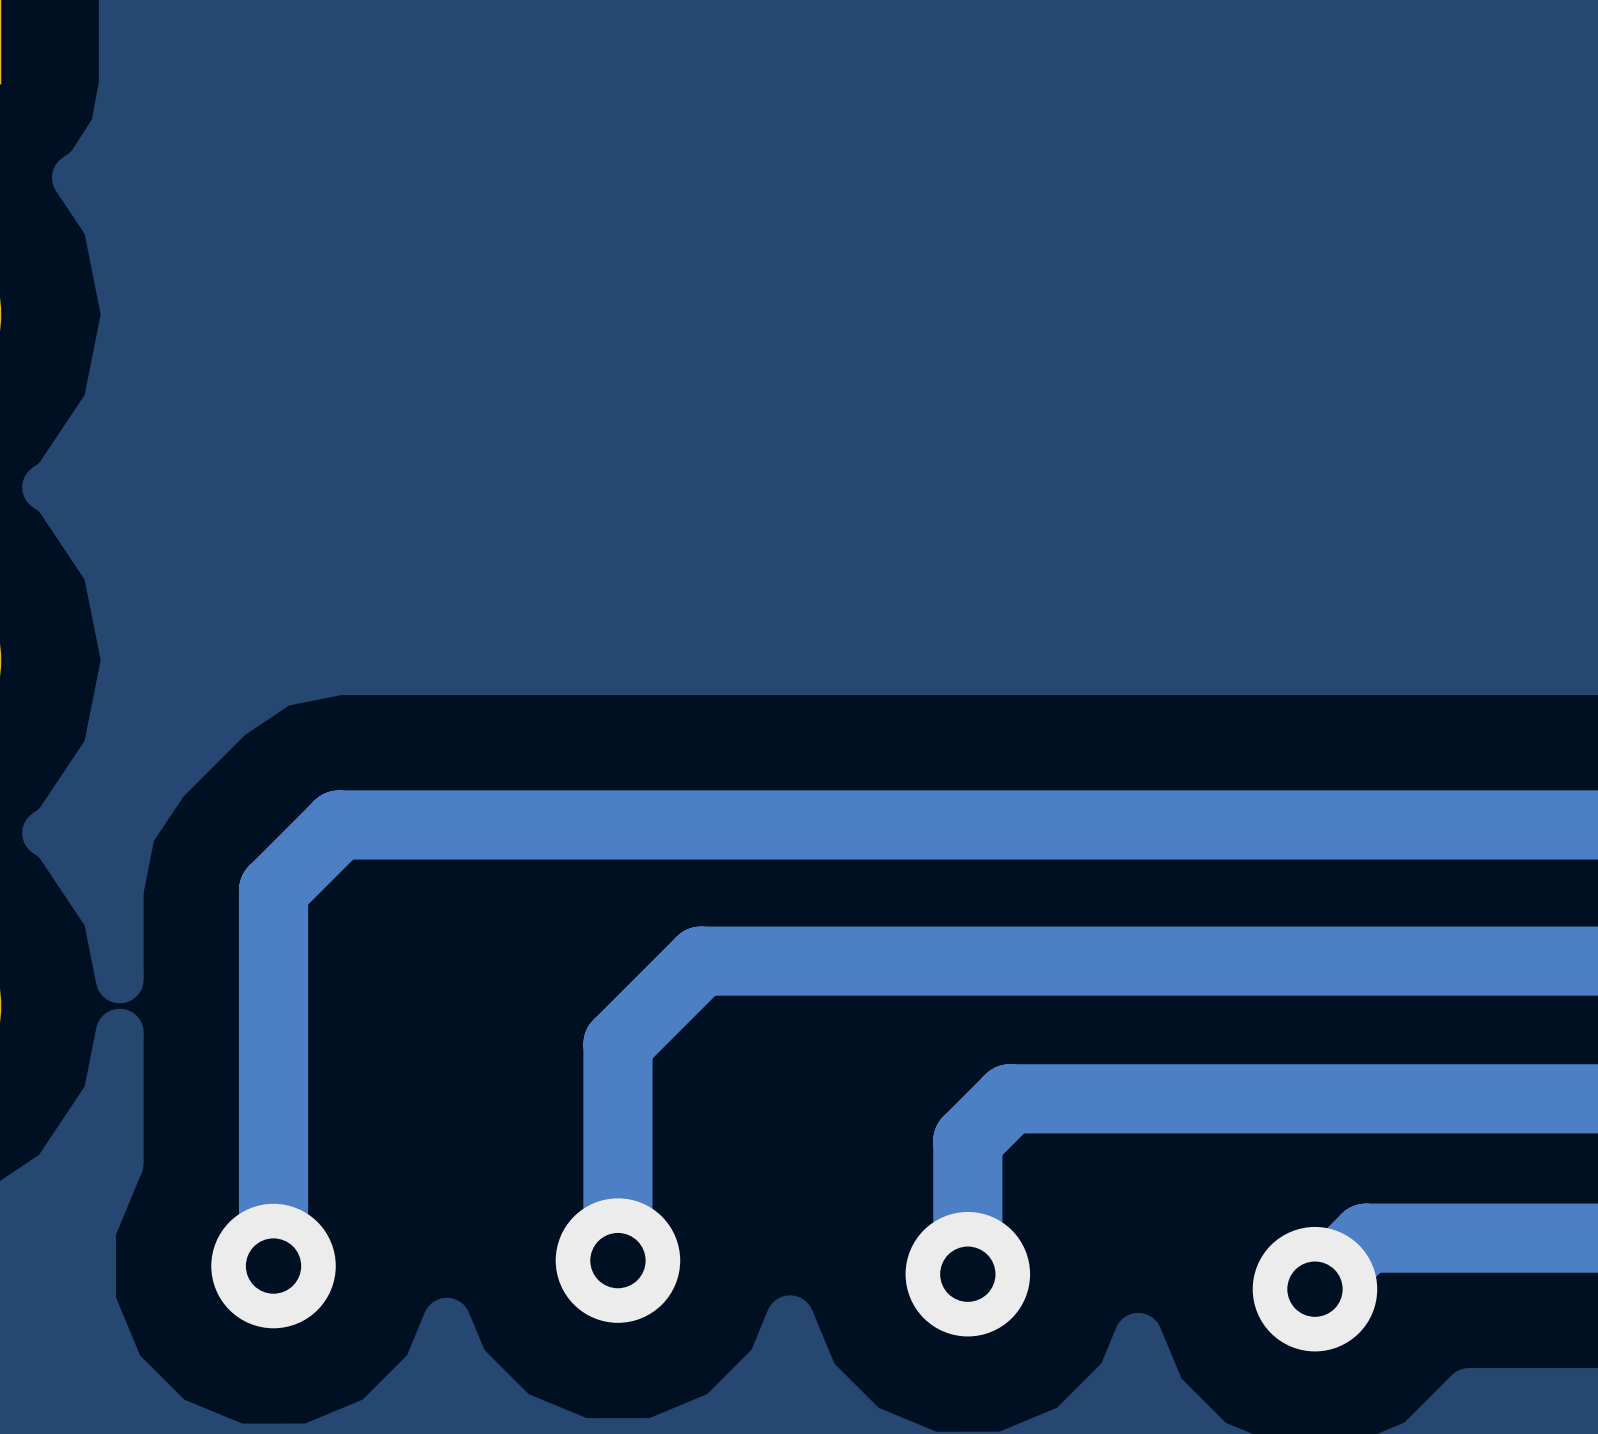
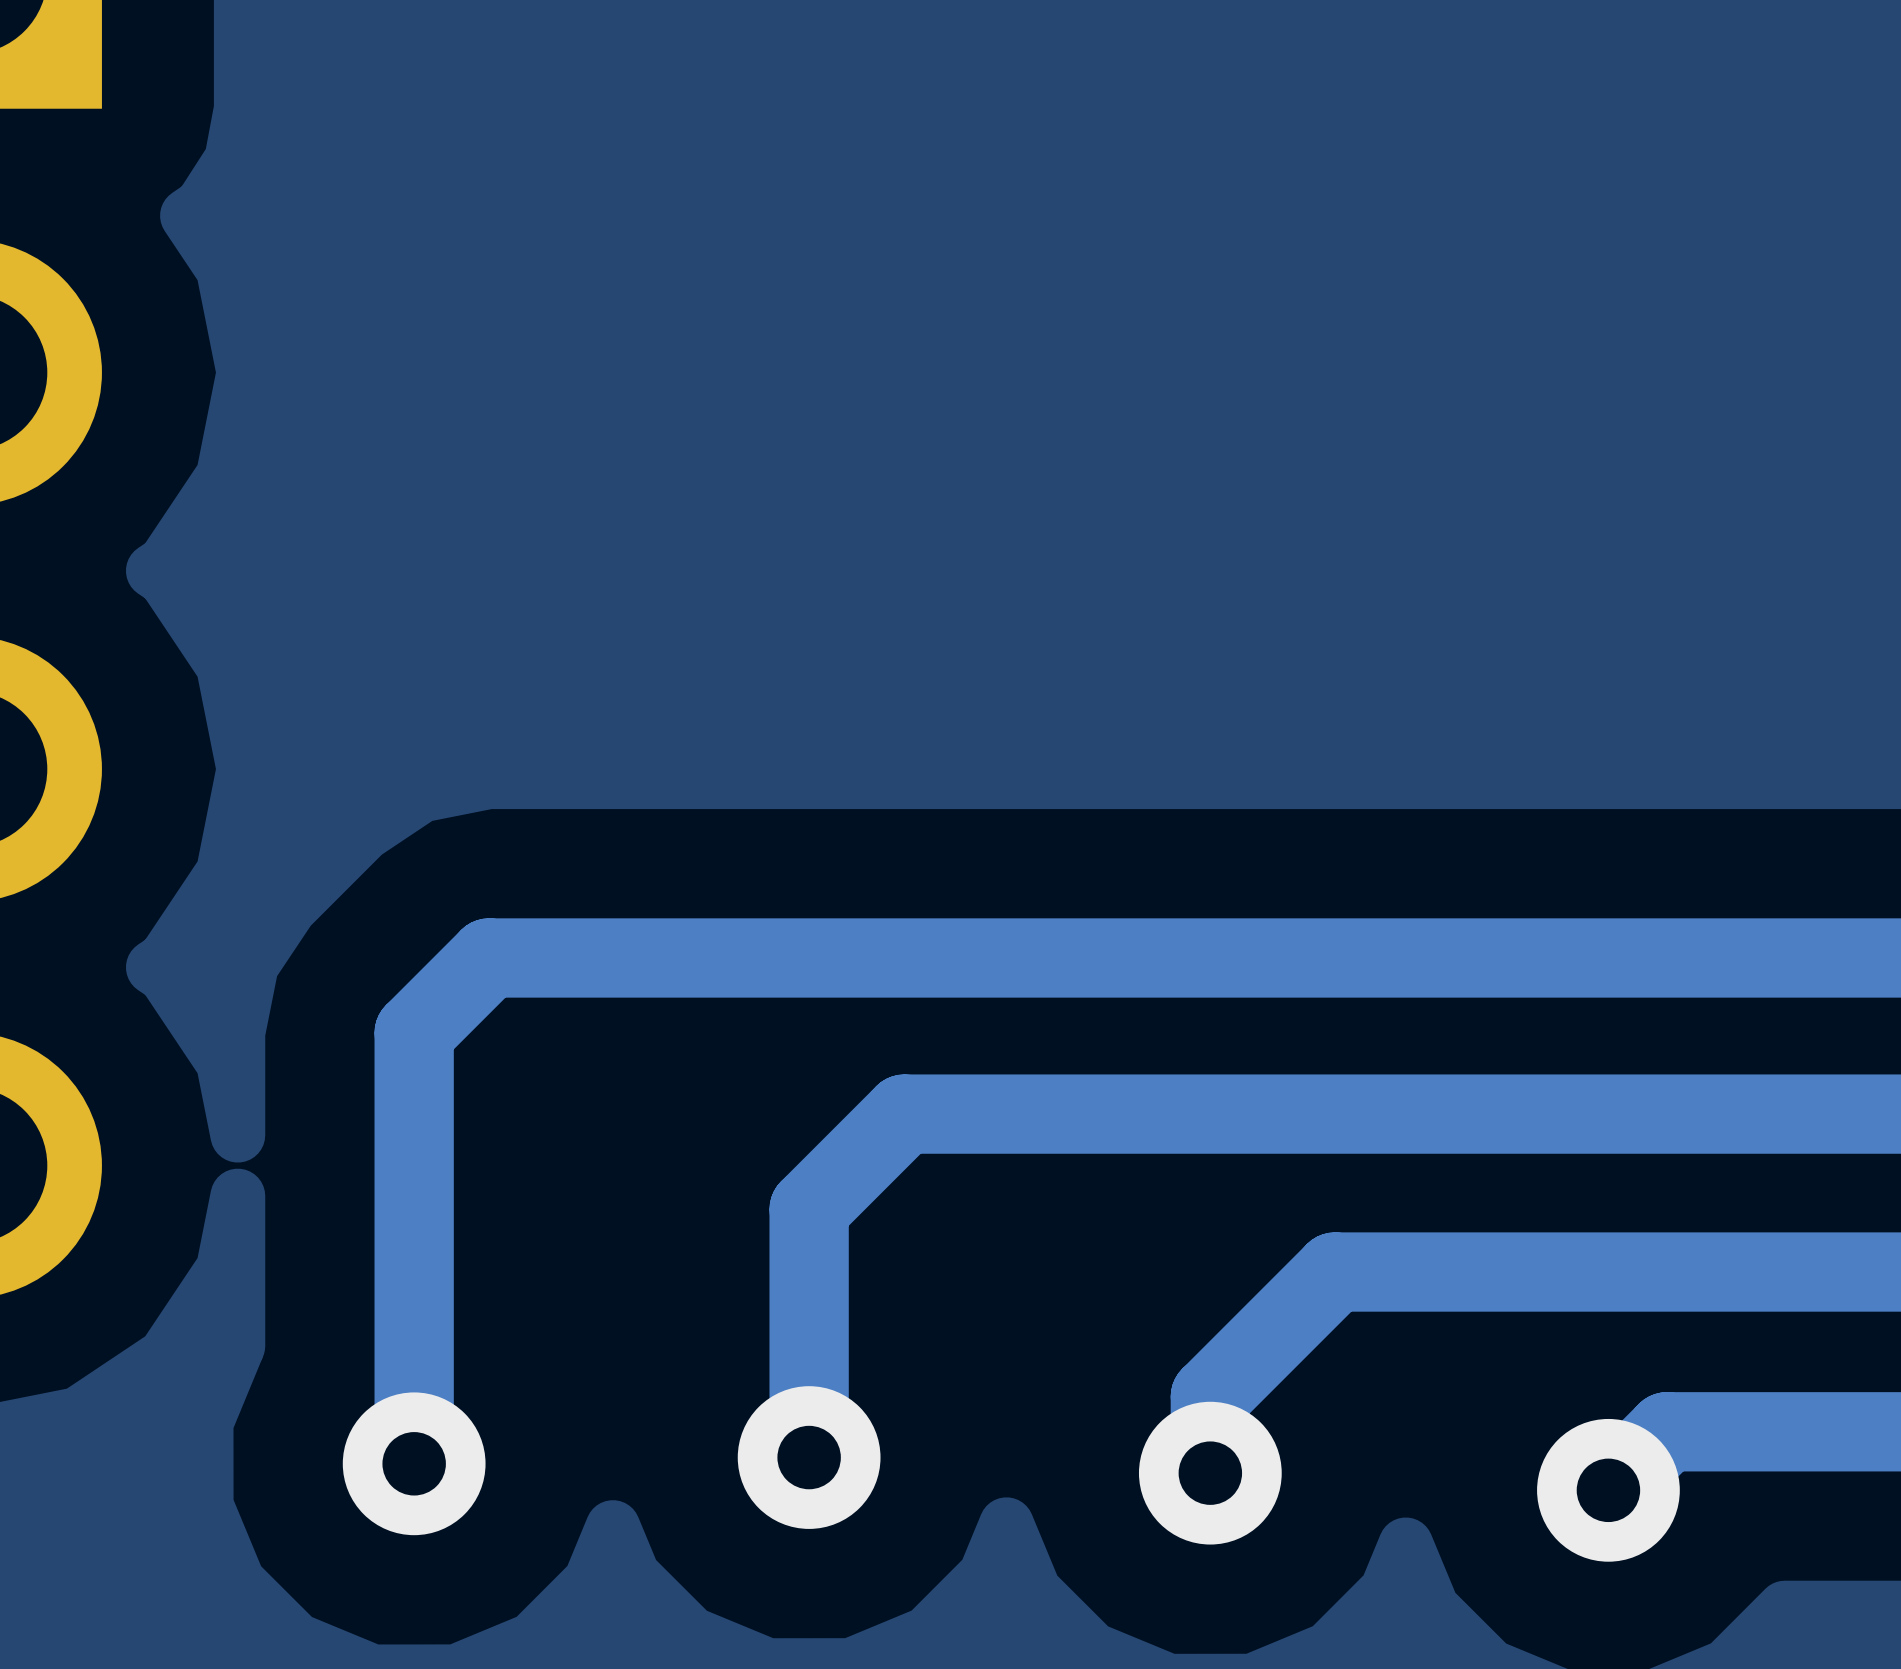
track: (1076, 1098) (1009, 1098) (967, 1140) (967, 1207) -> (1334, 1272) (1210, 1396)

